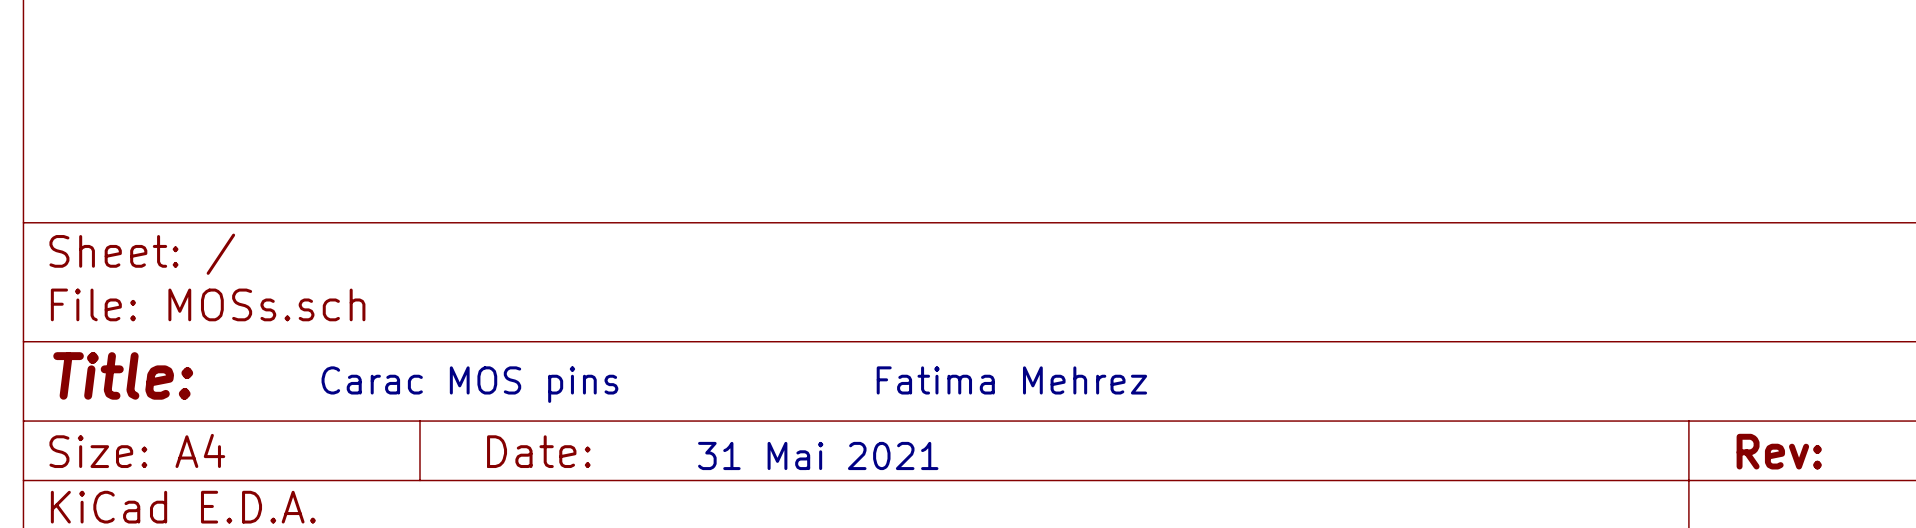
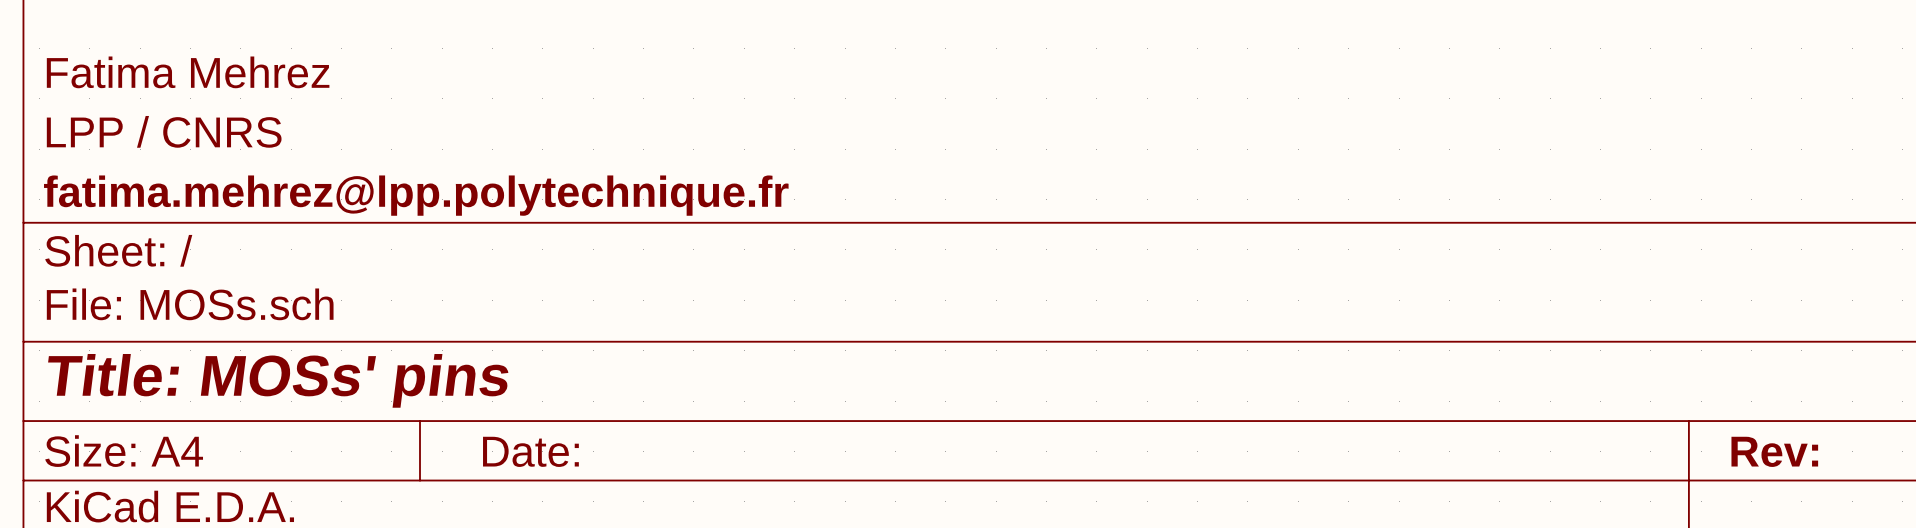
title block: none -> Fatima Mehrez (188, 72)
title block: none -> LPP / CNRS (164, 131)
title block: none -> fatima.mehrez@lpp.polytechnique.fr (416, 195)
title block: Title: (123, 375) -> Title: MOSs' pins (278, 380)
text: Fatima Mehrez (1011, 380) -> none
text: Carac MOS pins (469, 384) -> none
text: 31 Mai 2021 (818, 455) -> none

